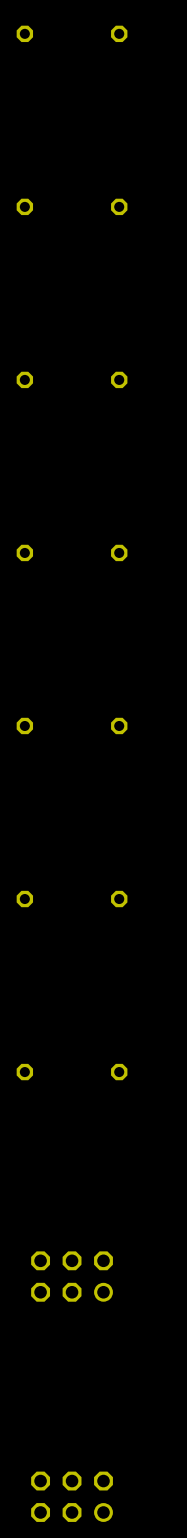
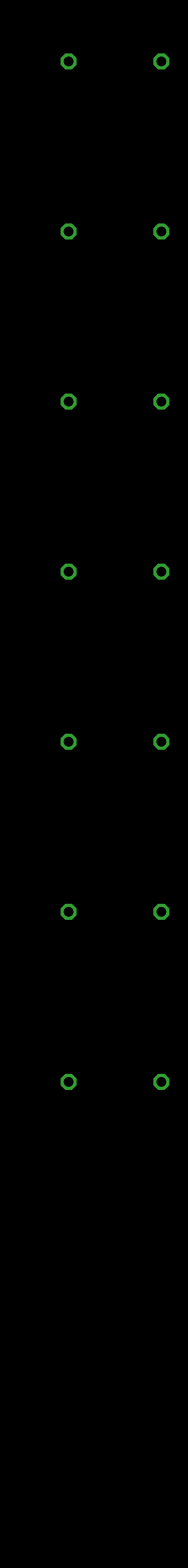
part: (72, 1276) -> none
part: (72, 1496) -> none

